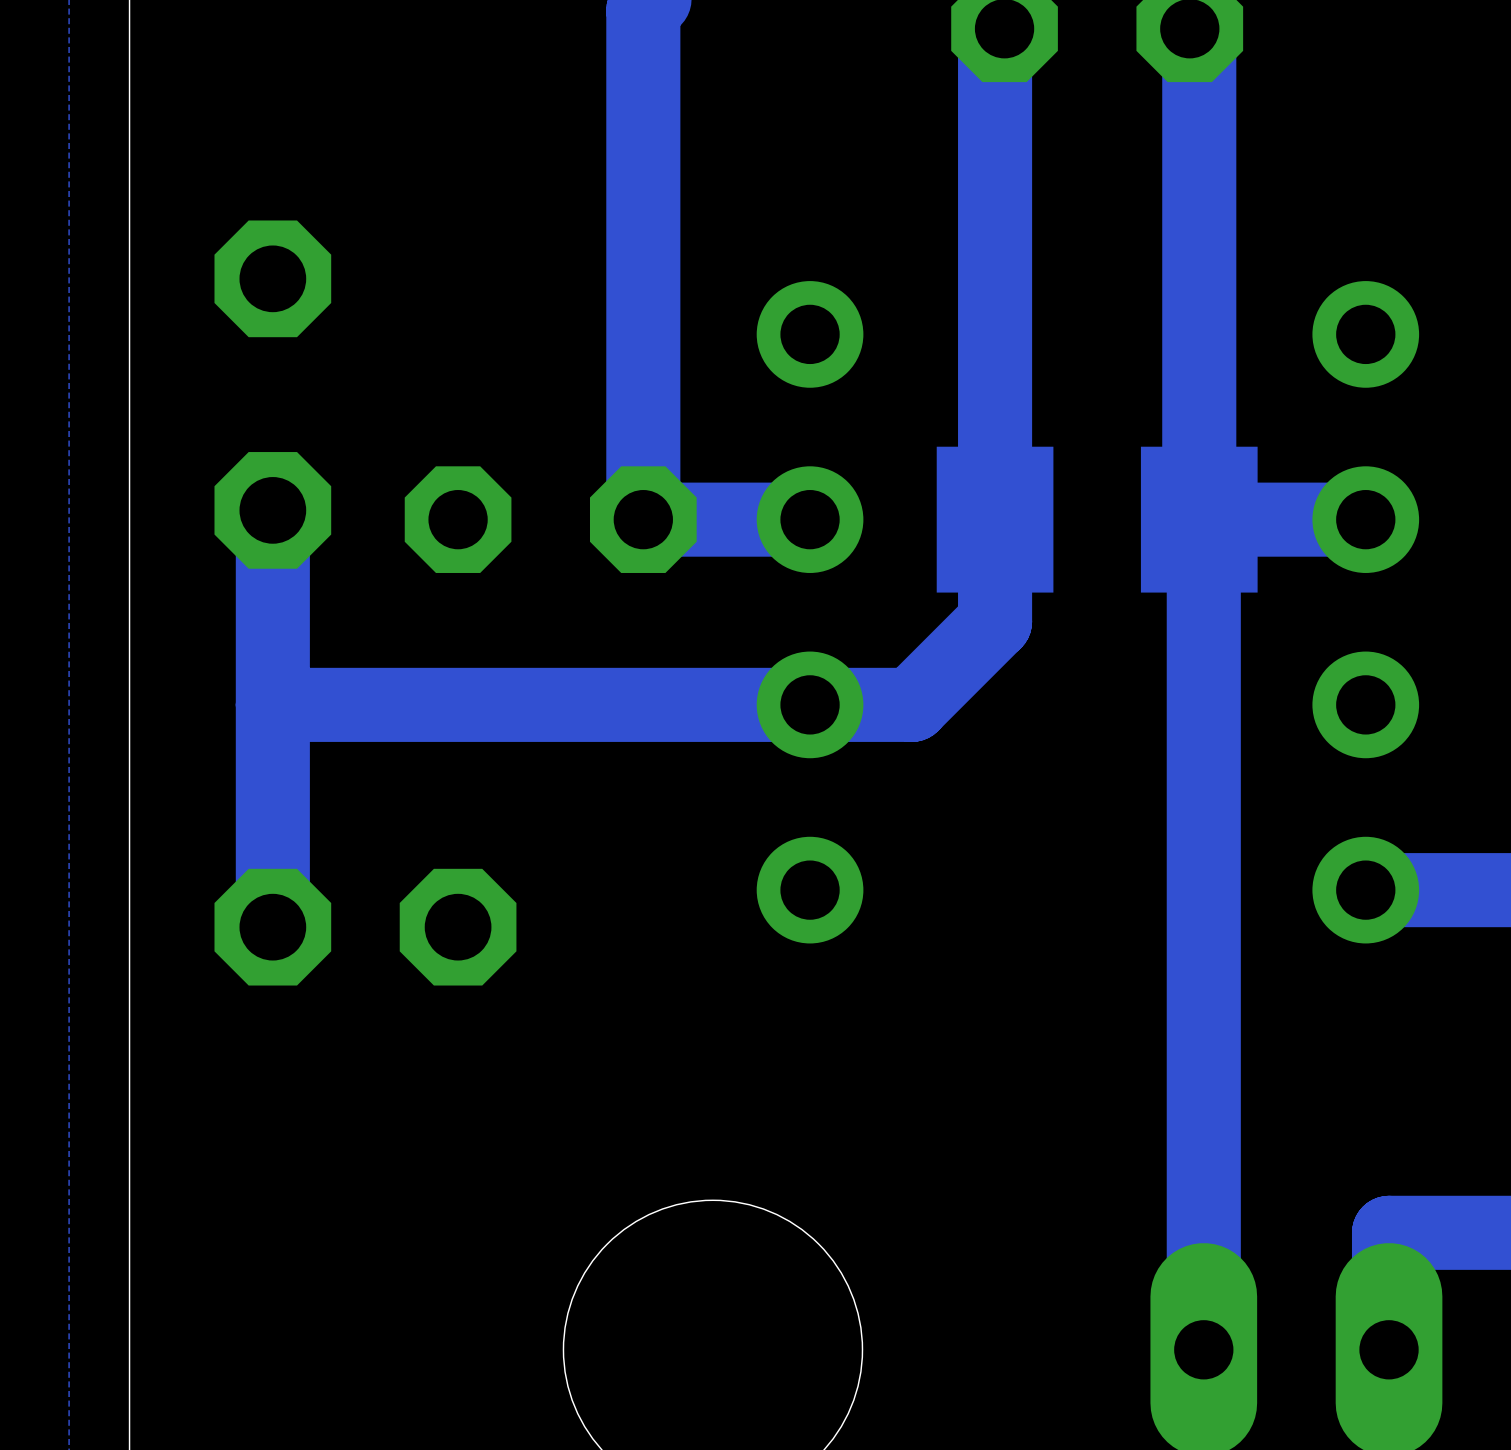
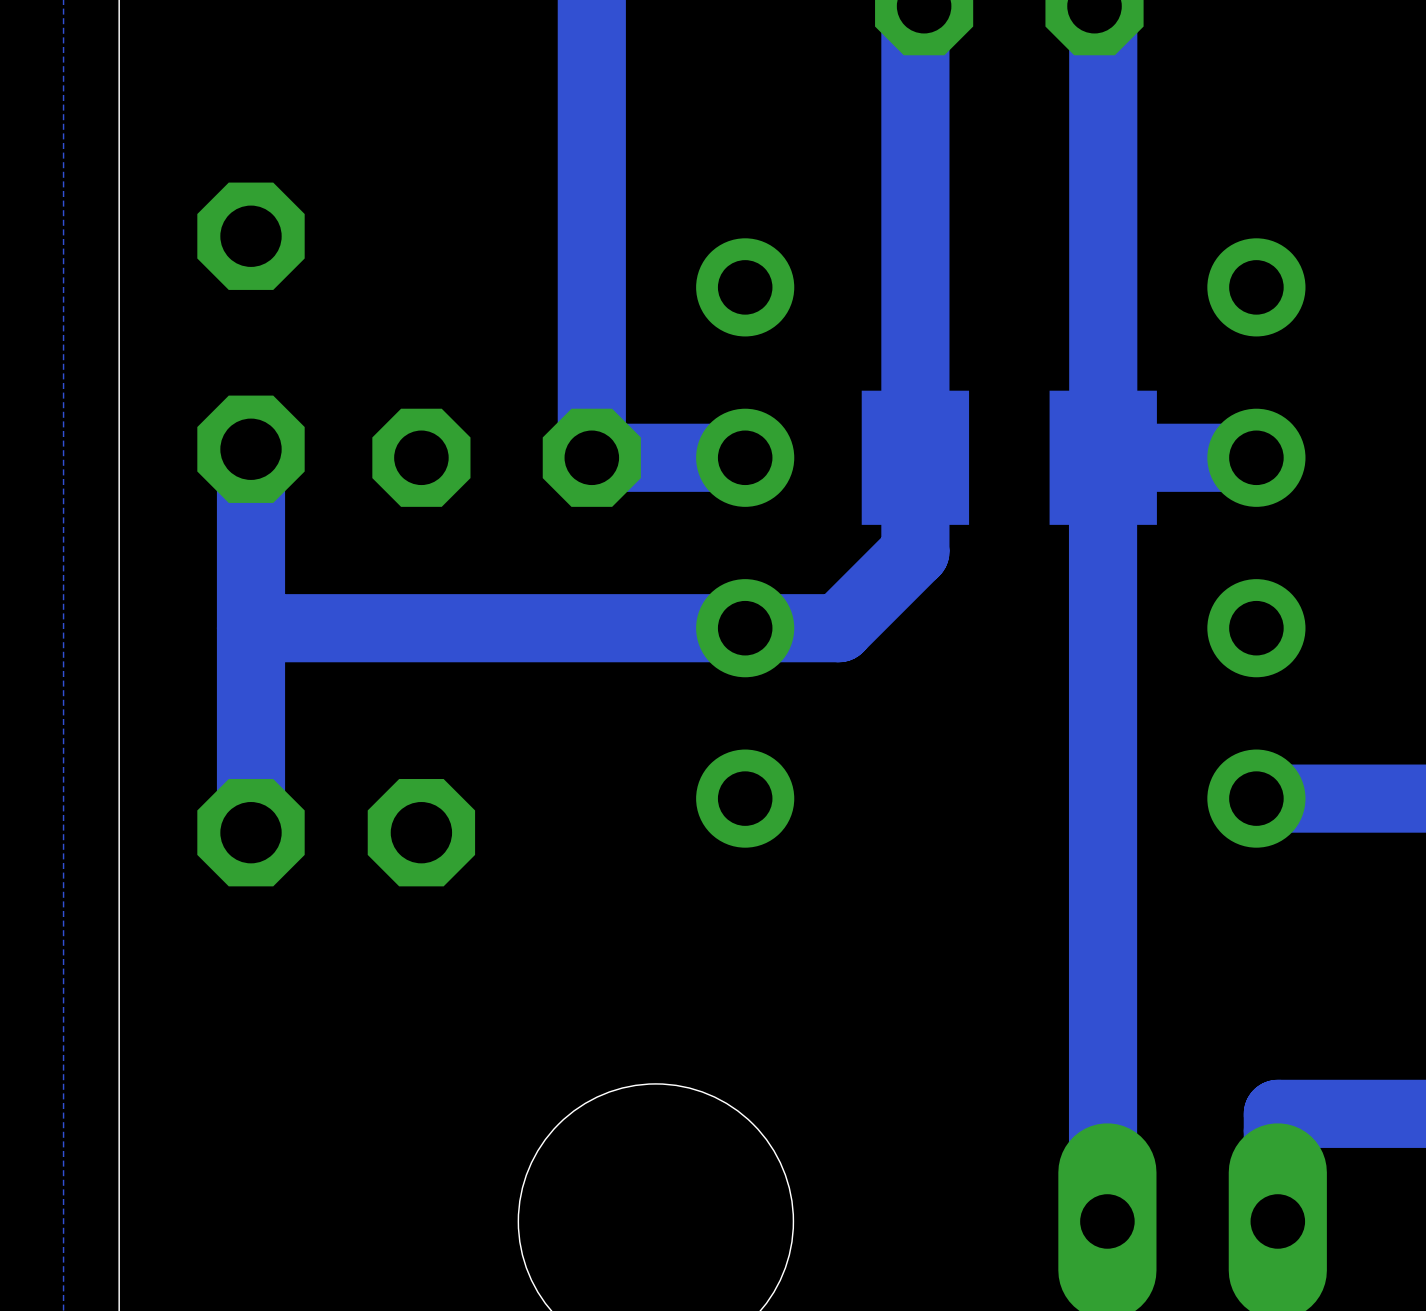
track: (1203, 519) (1203, 1349) -> (1103, 491) (1103, 1221) (1107, 1221)

